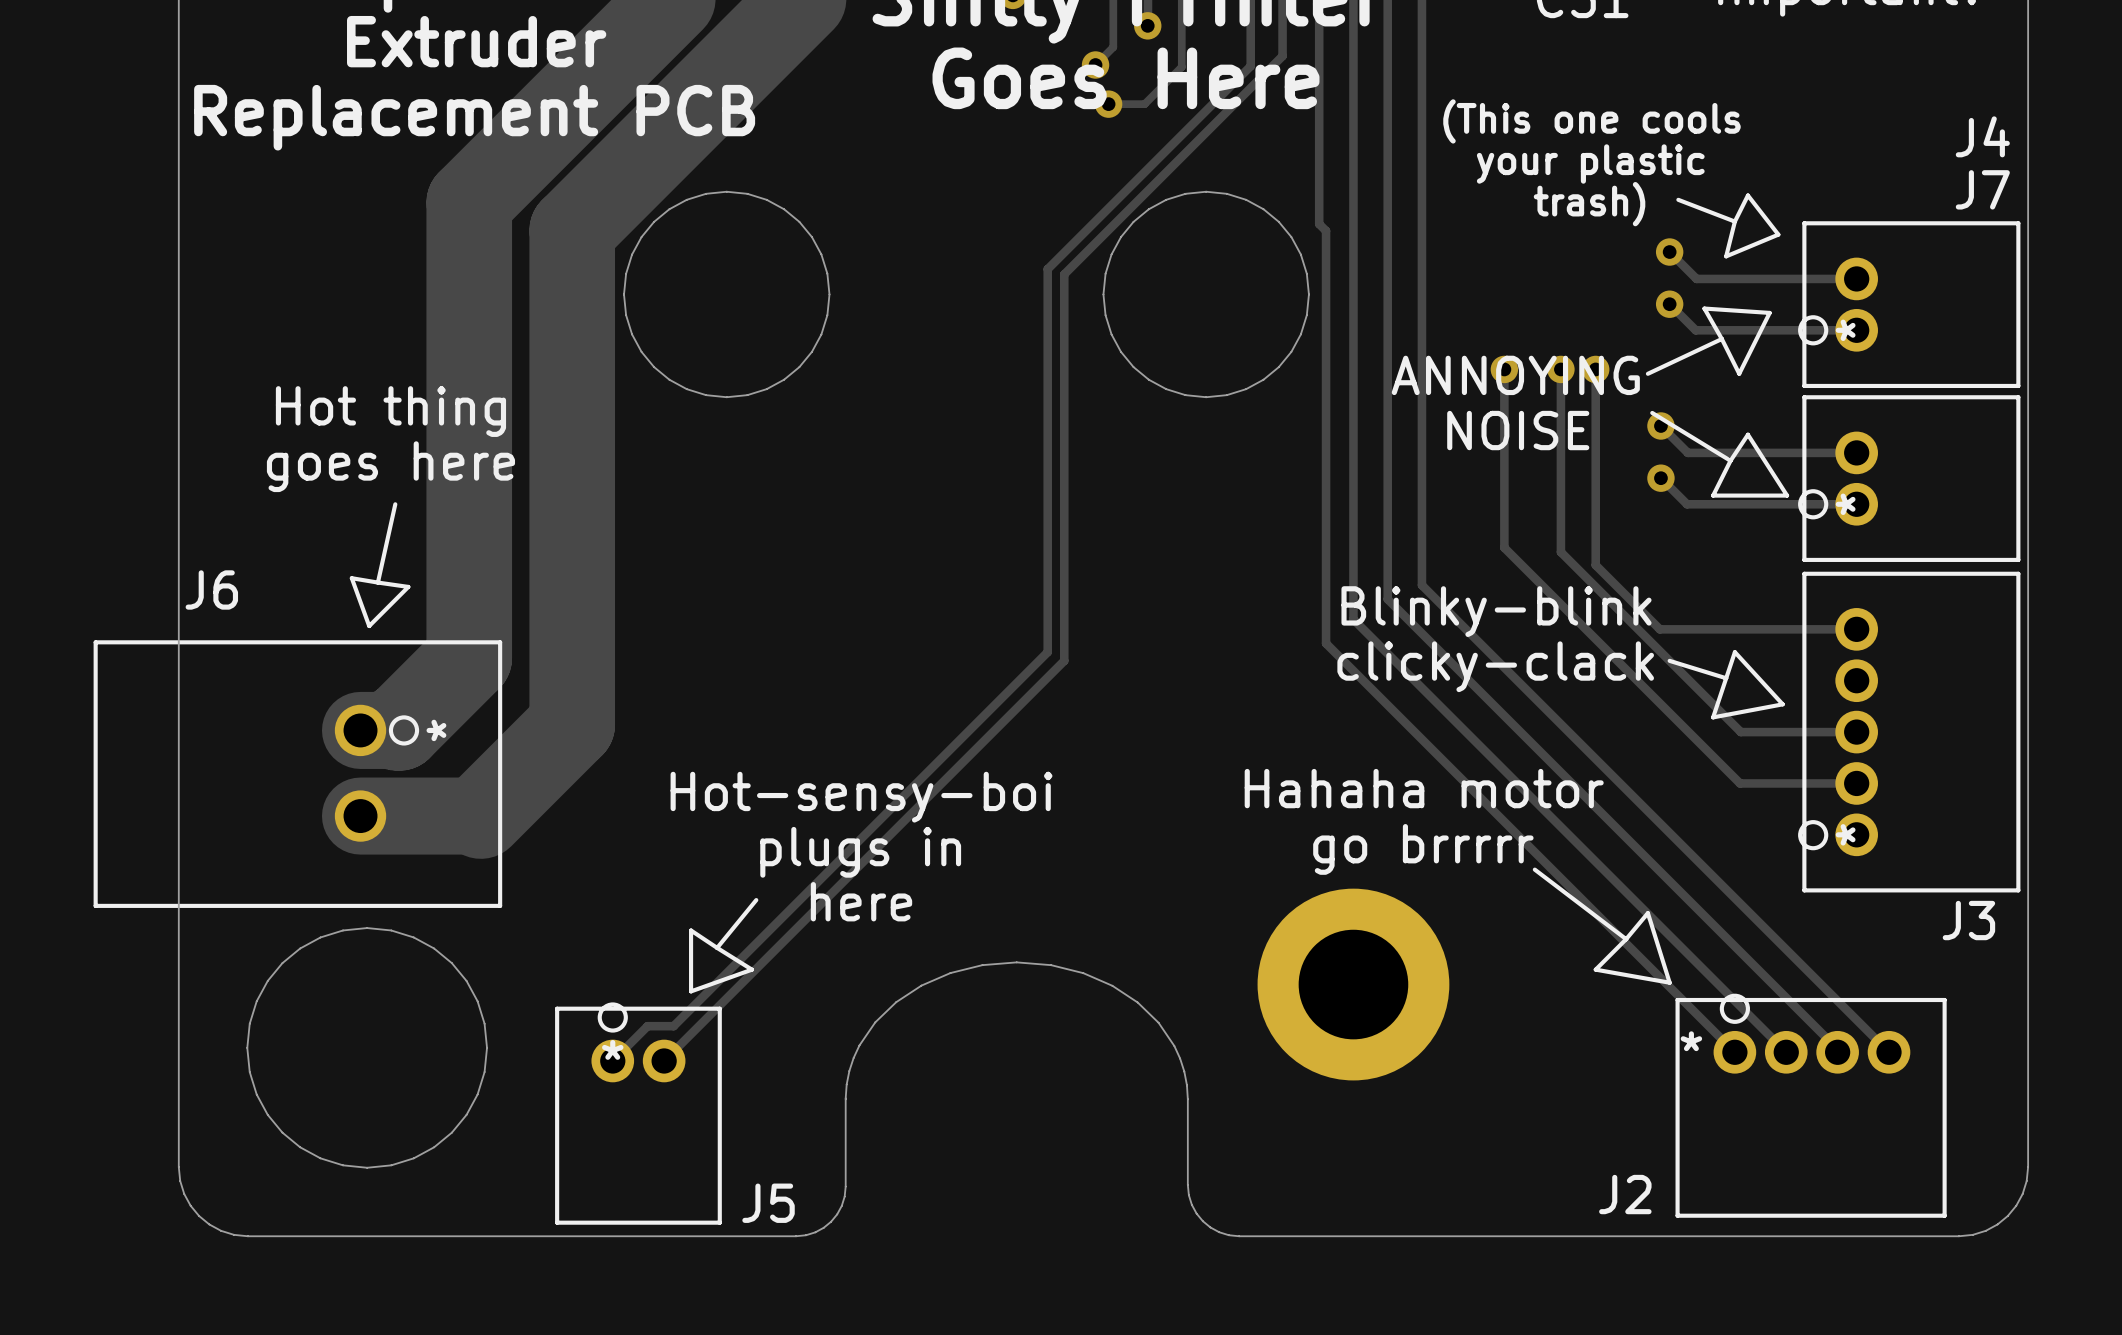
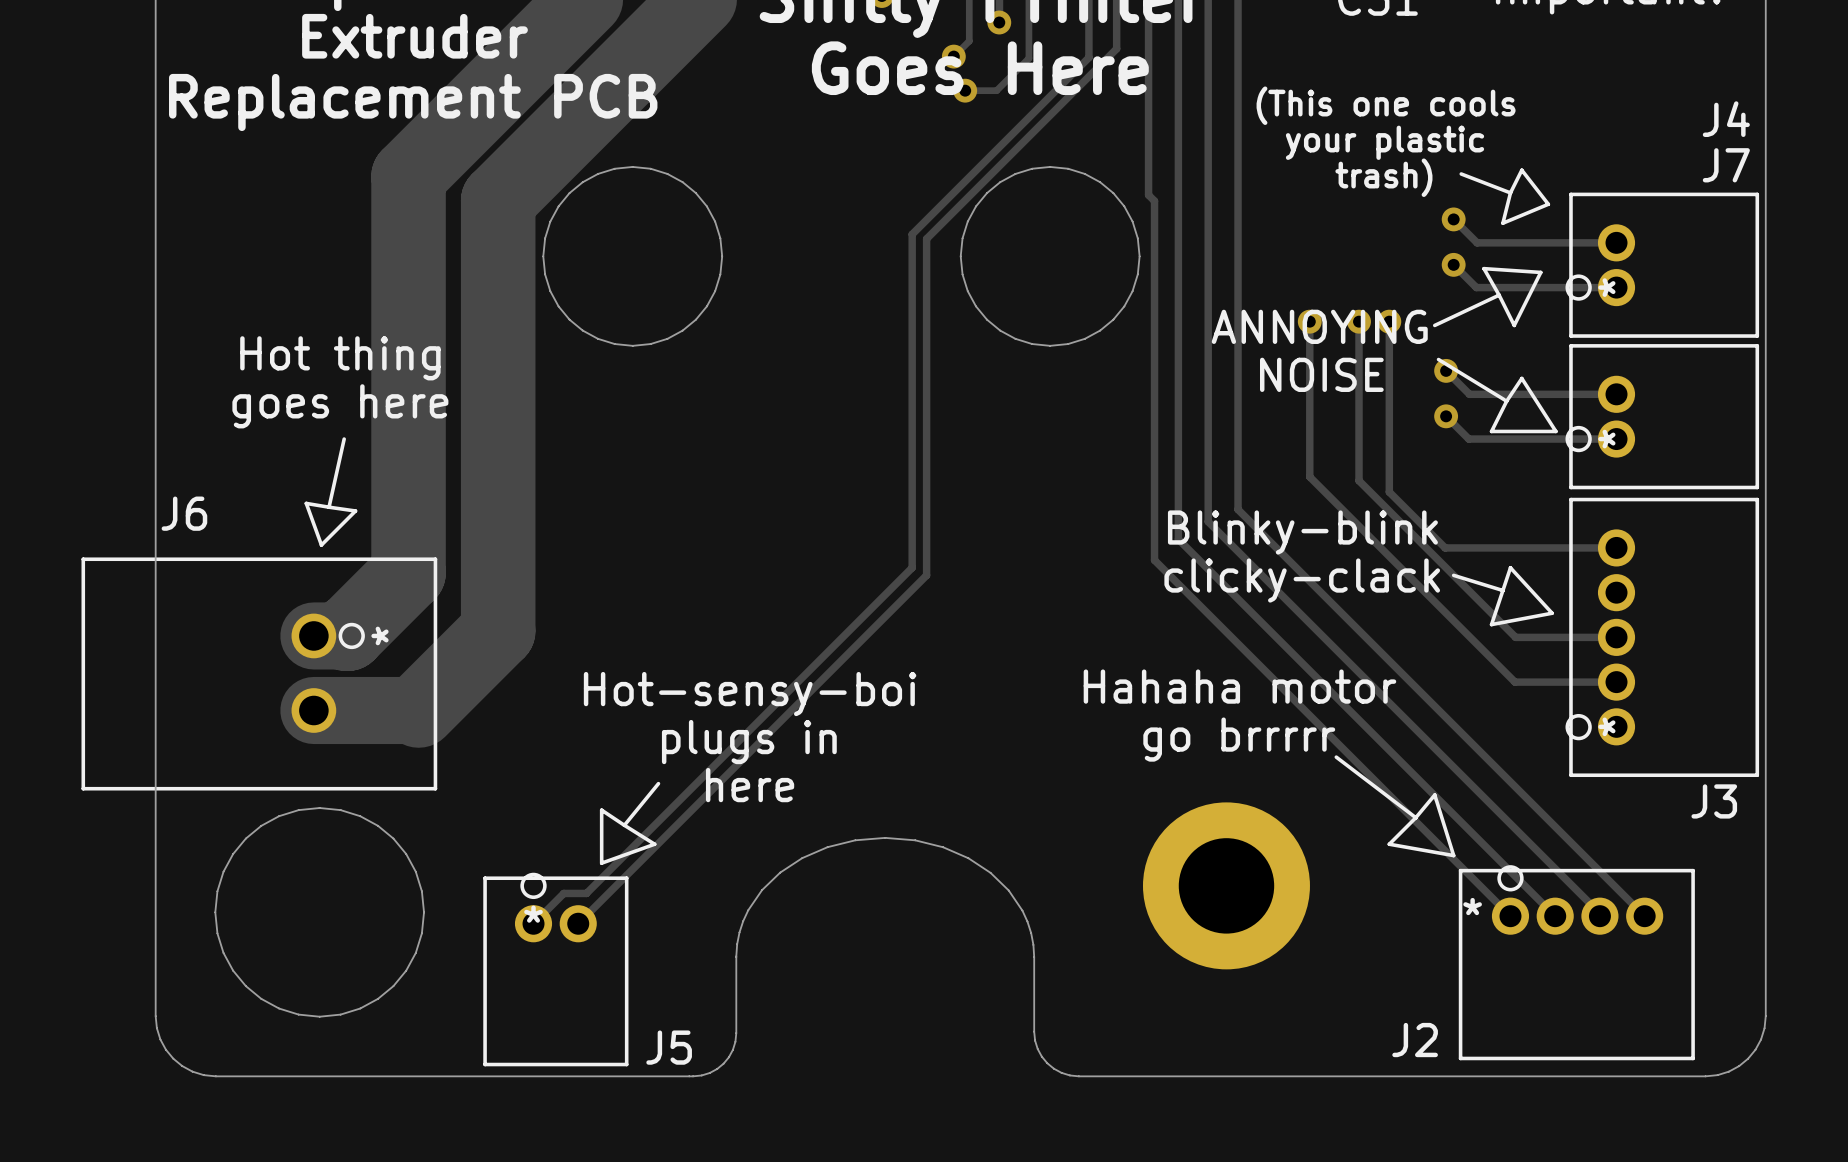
part position: (1353, 984) -> (1226, 885)

